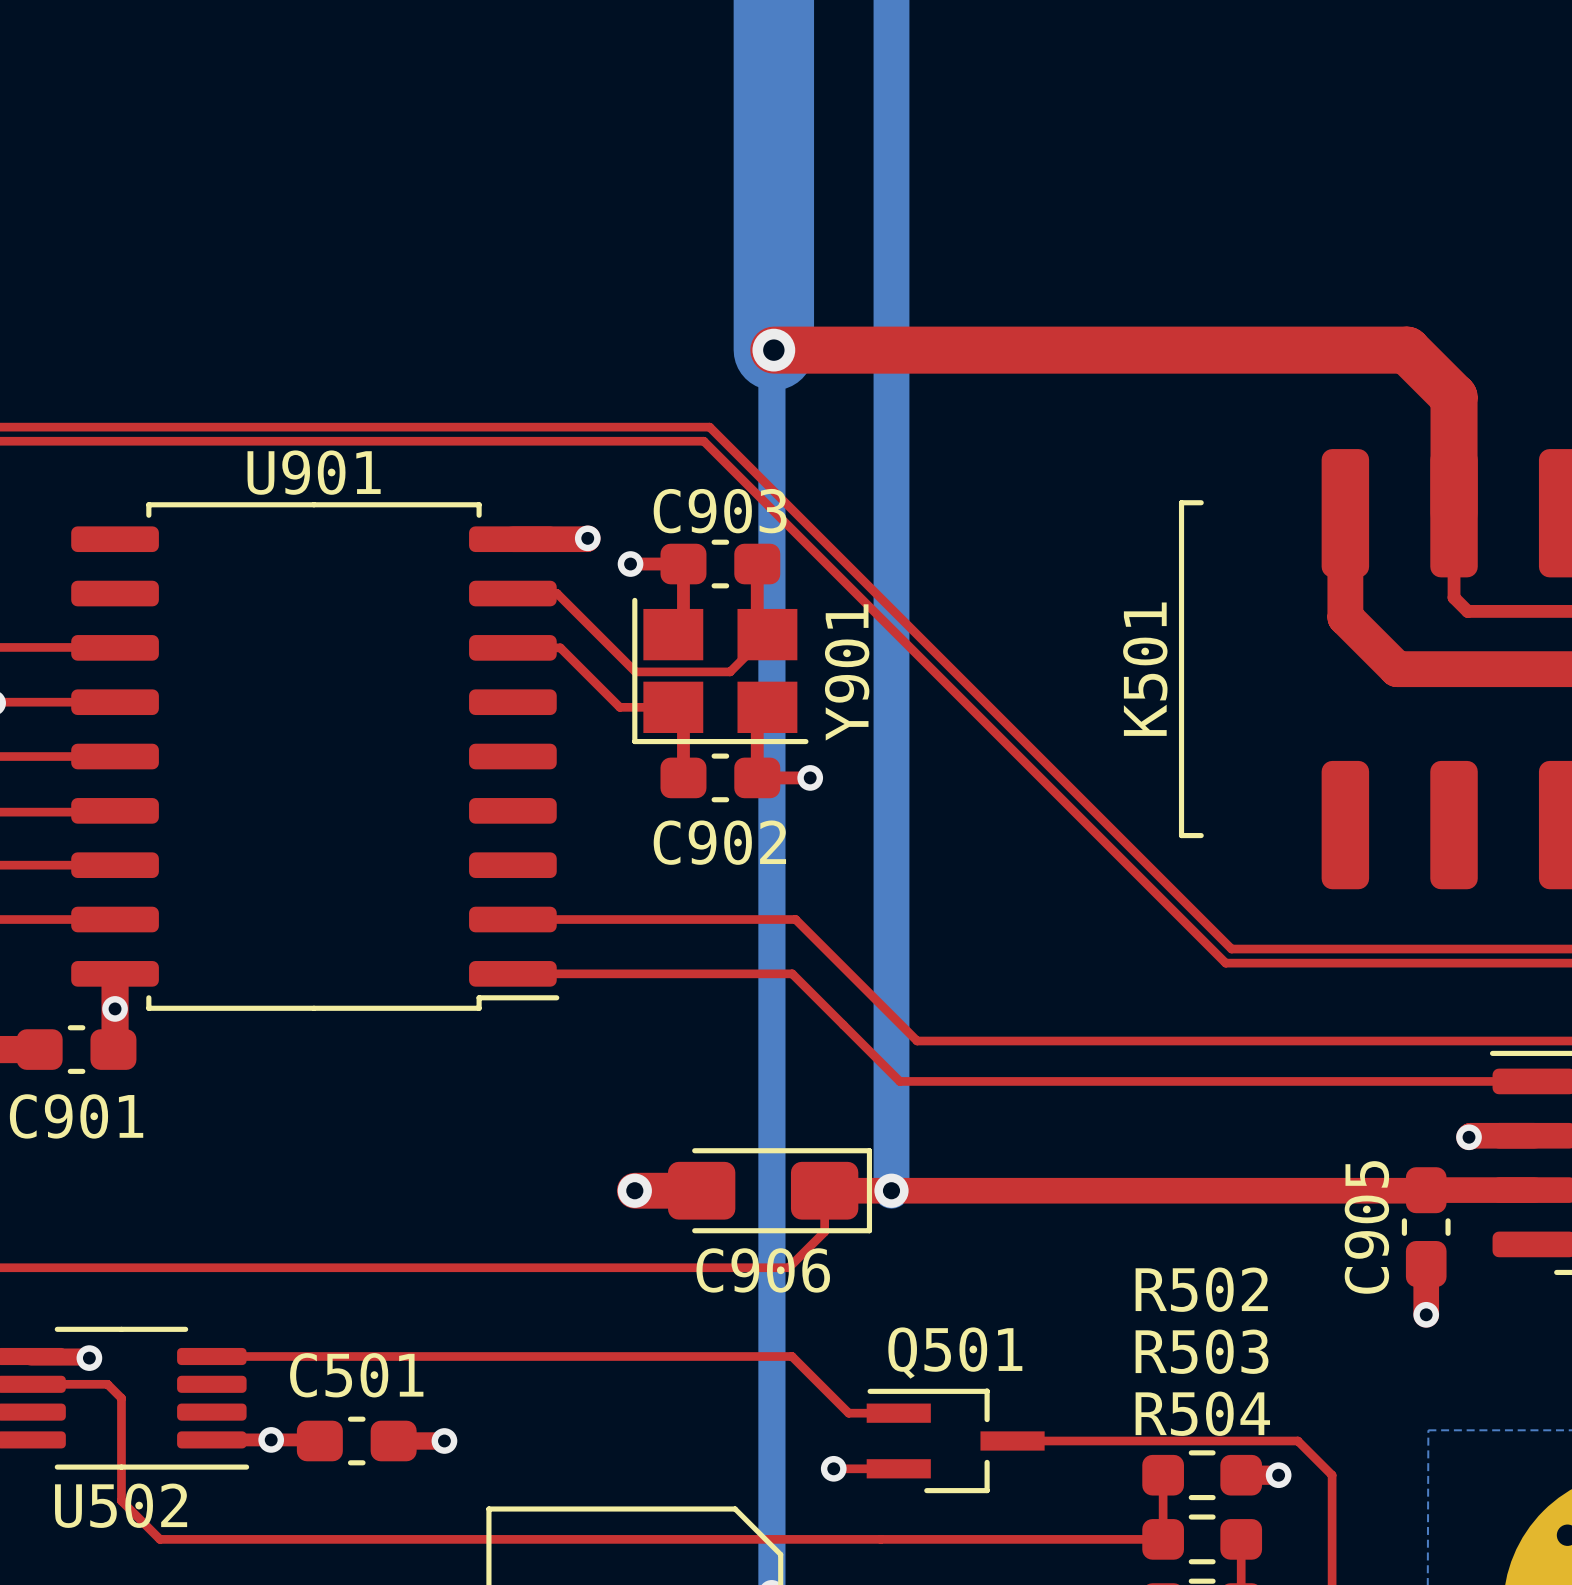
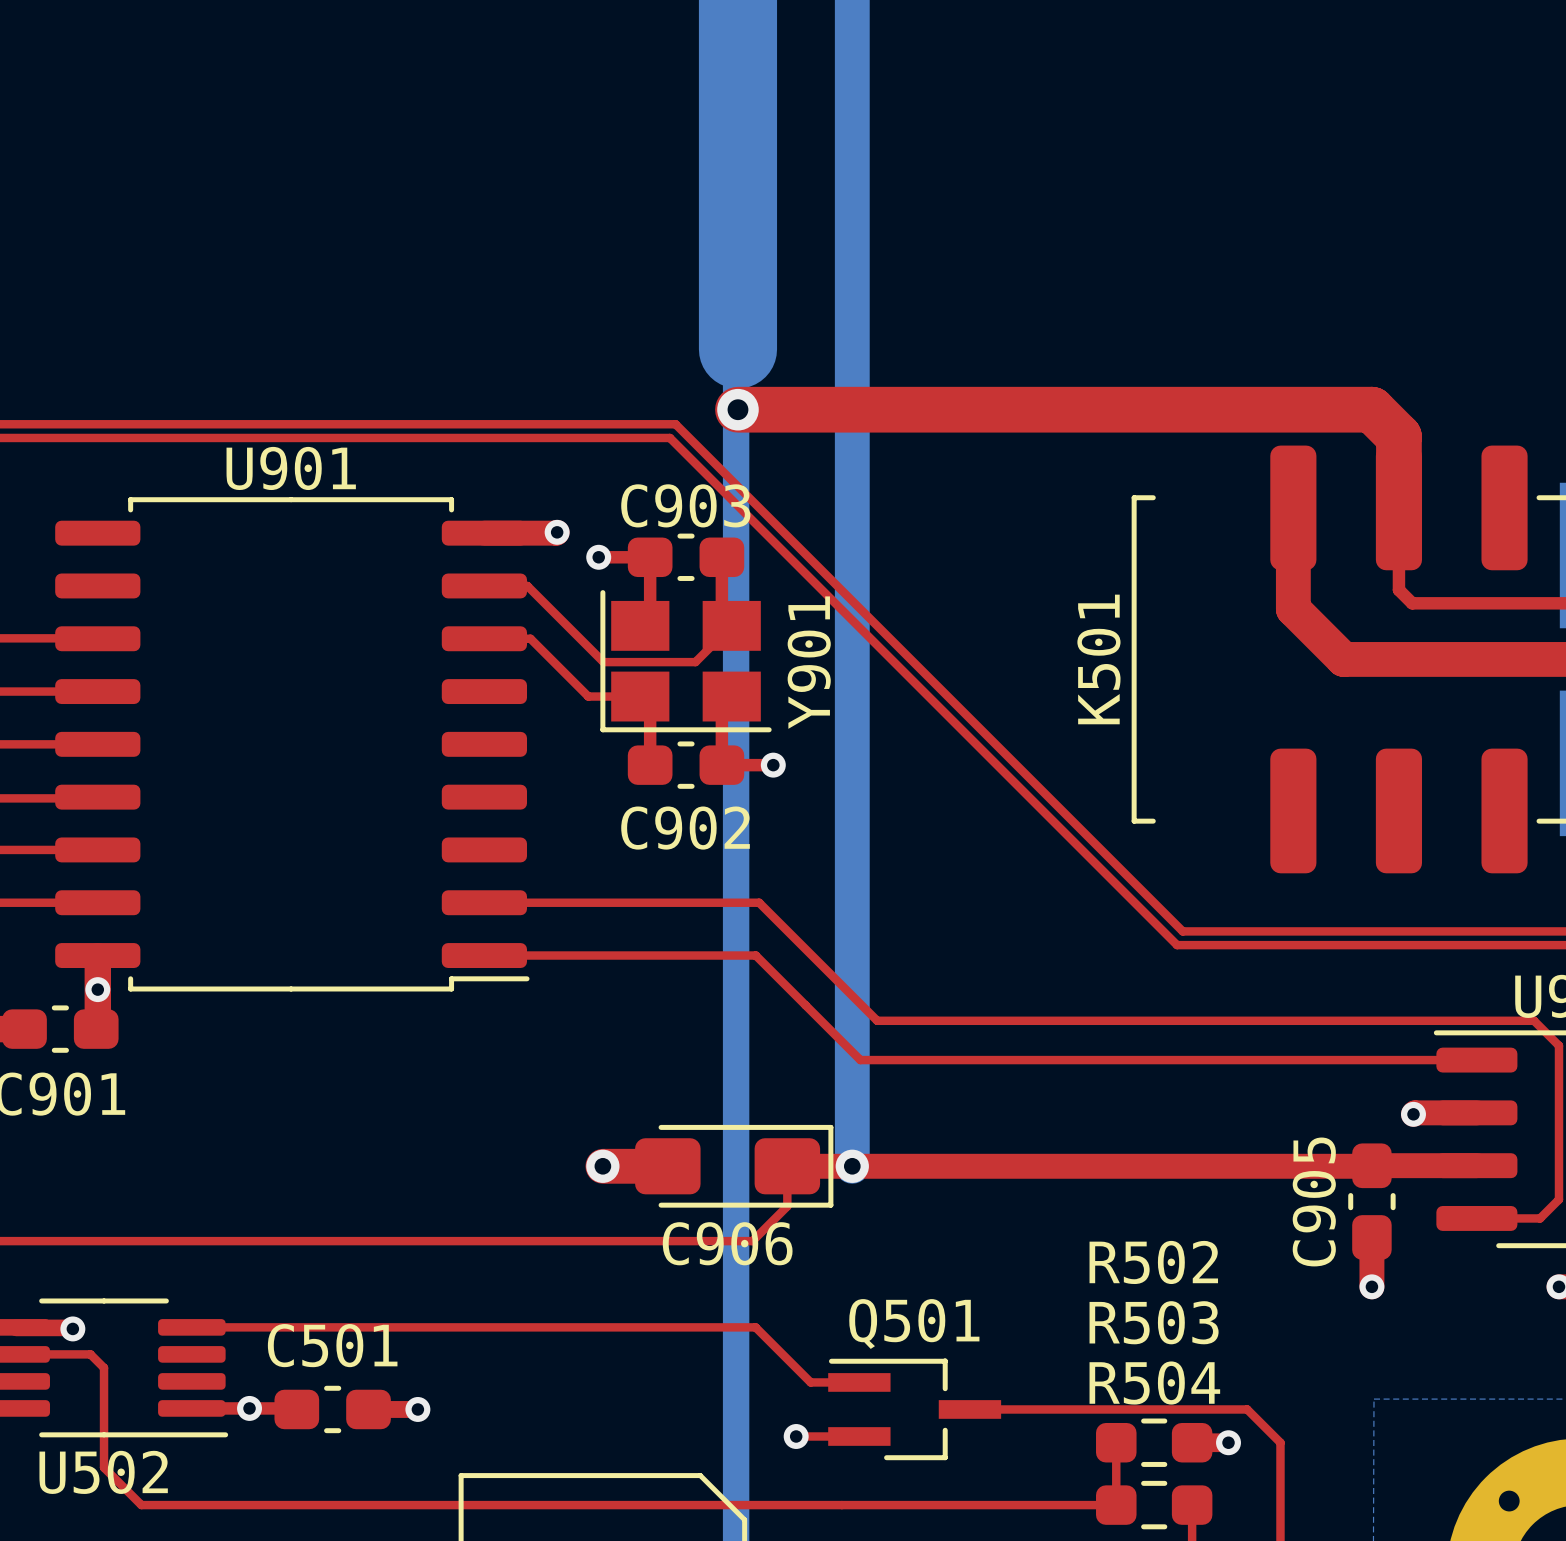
top track: (773, 350) (1406, 350) (1454, 397) (1454, 439) -> (737, 409) (1371, 409) (1398, 436)
via position: (773, 350) -> (737, 409)

